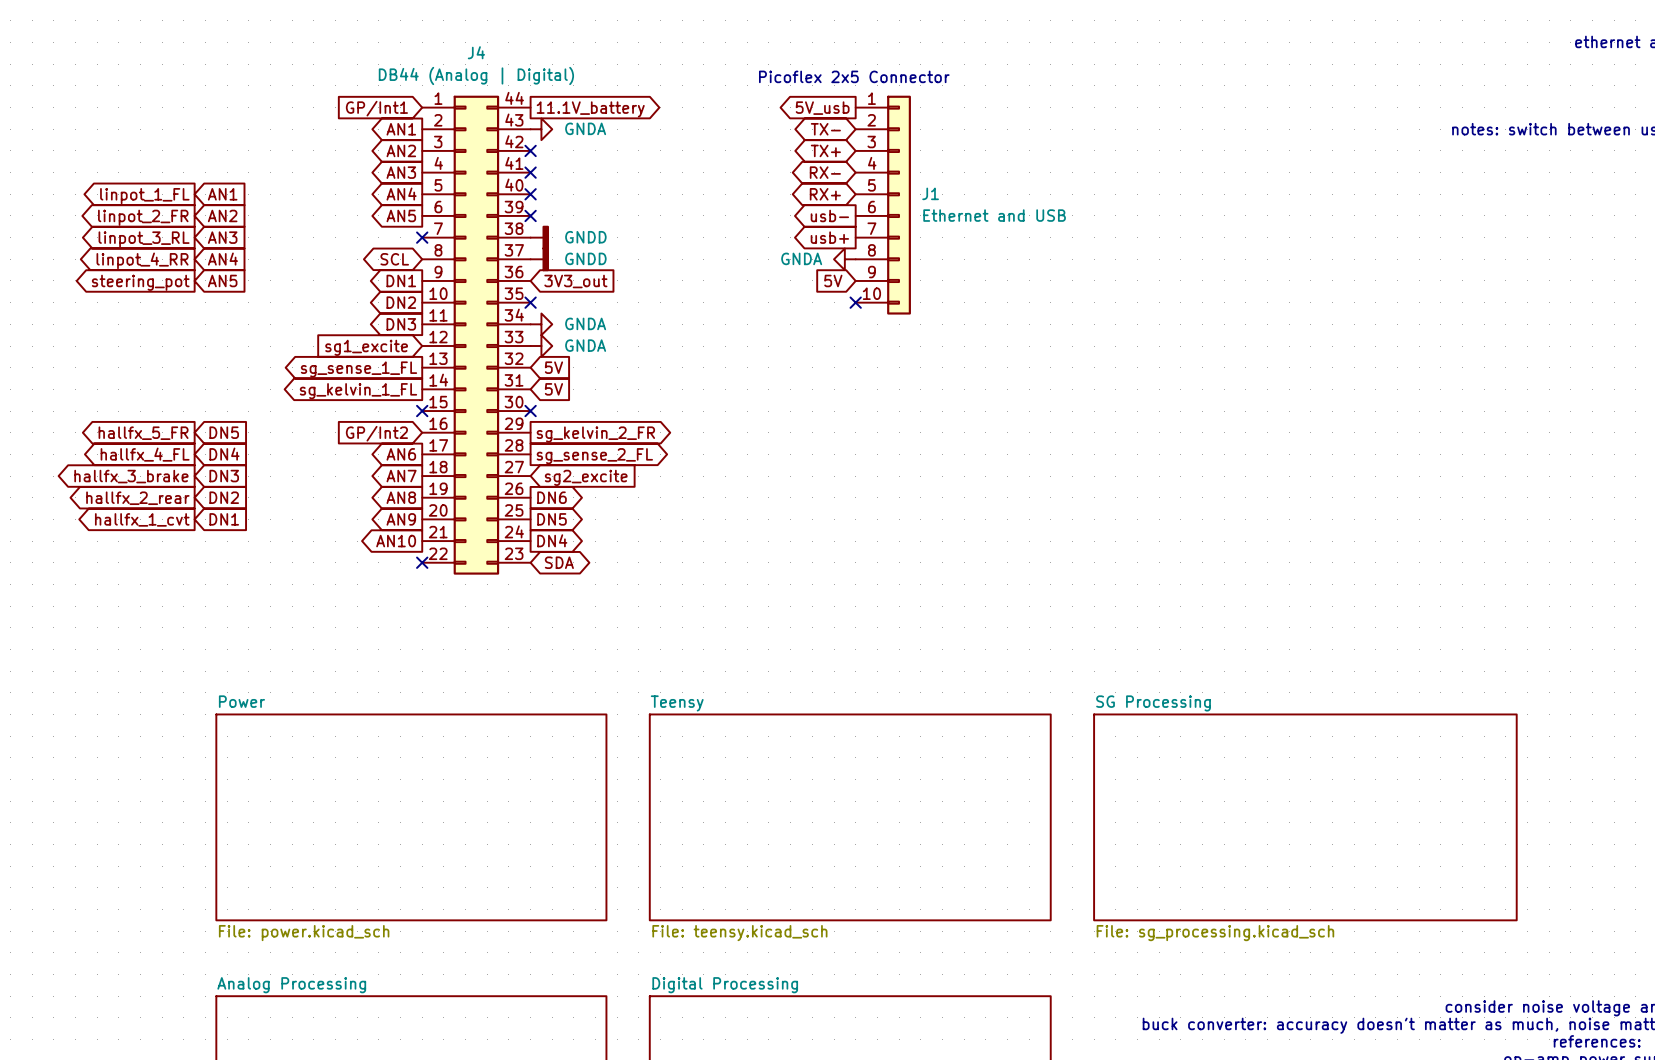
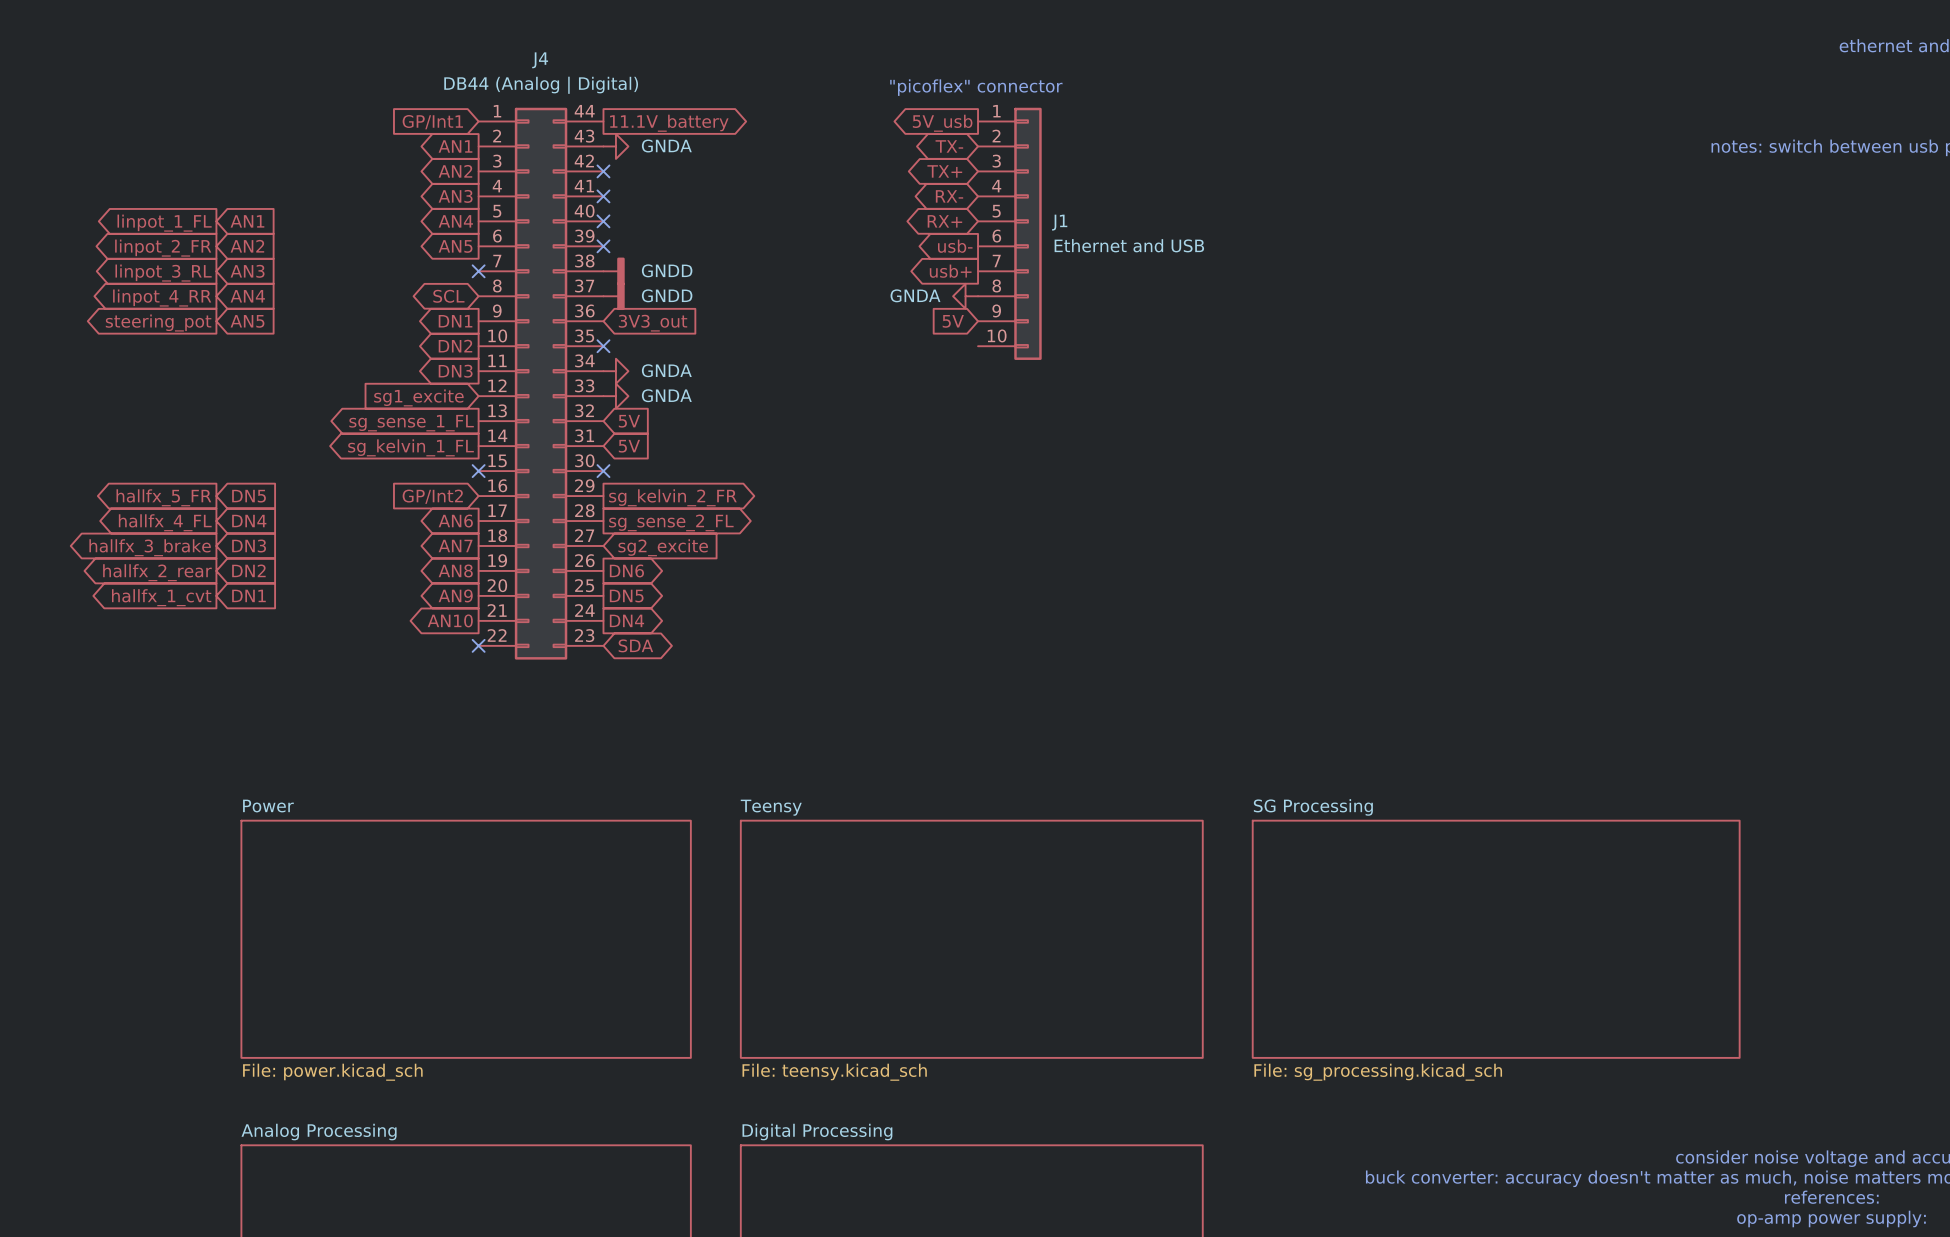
text: Picoflex 2x5 Connector (854, 76) -> "picoflex" connector (976, 87)
no-connect mark: (855, 302) -> none

